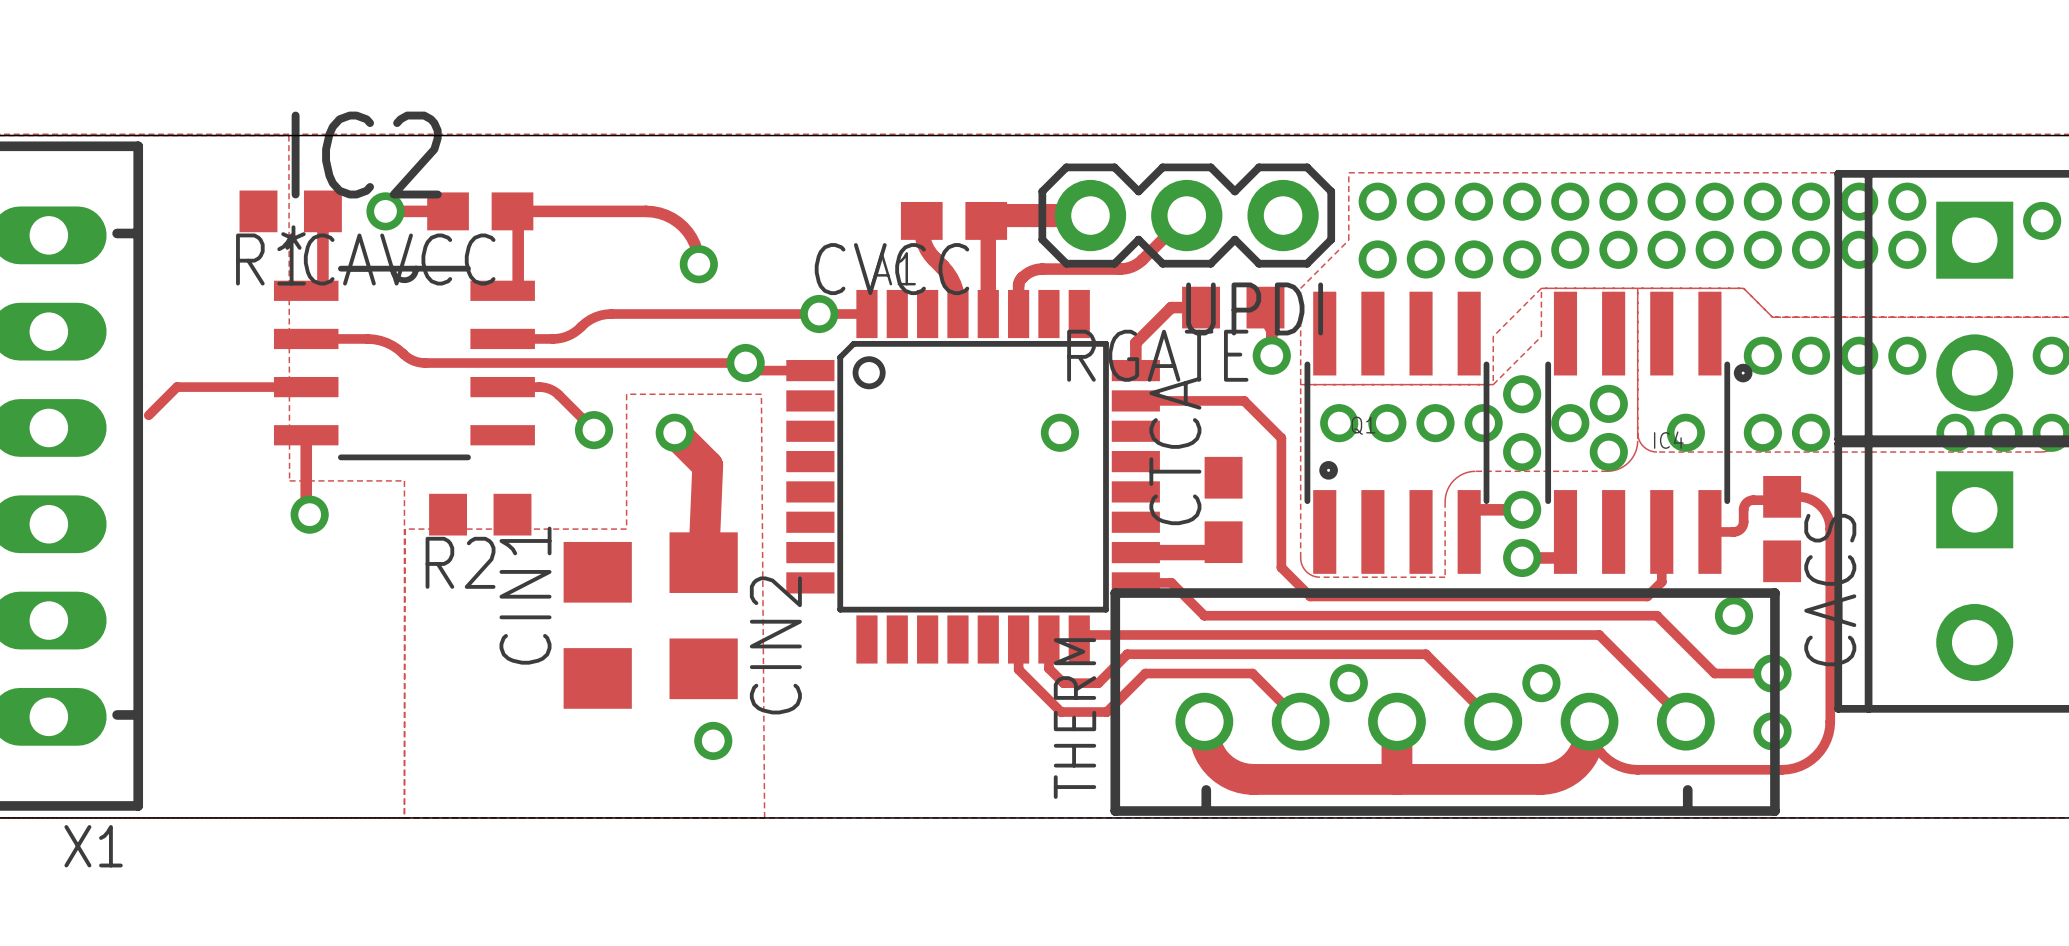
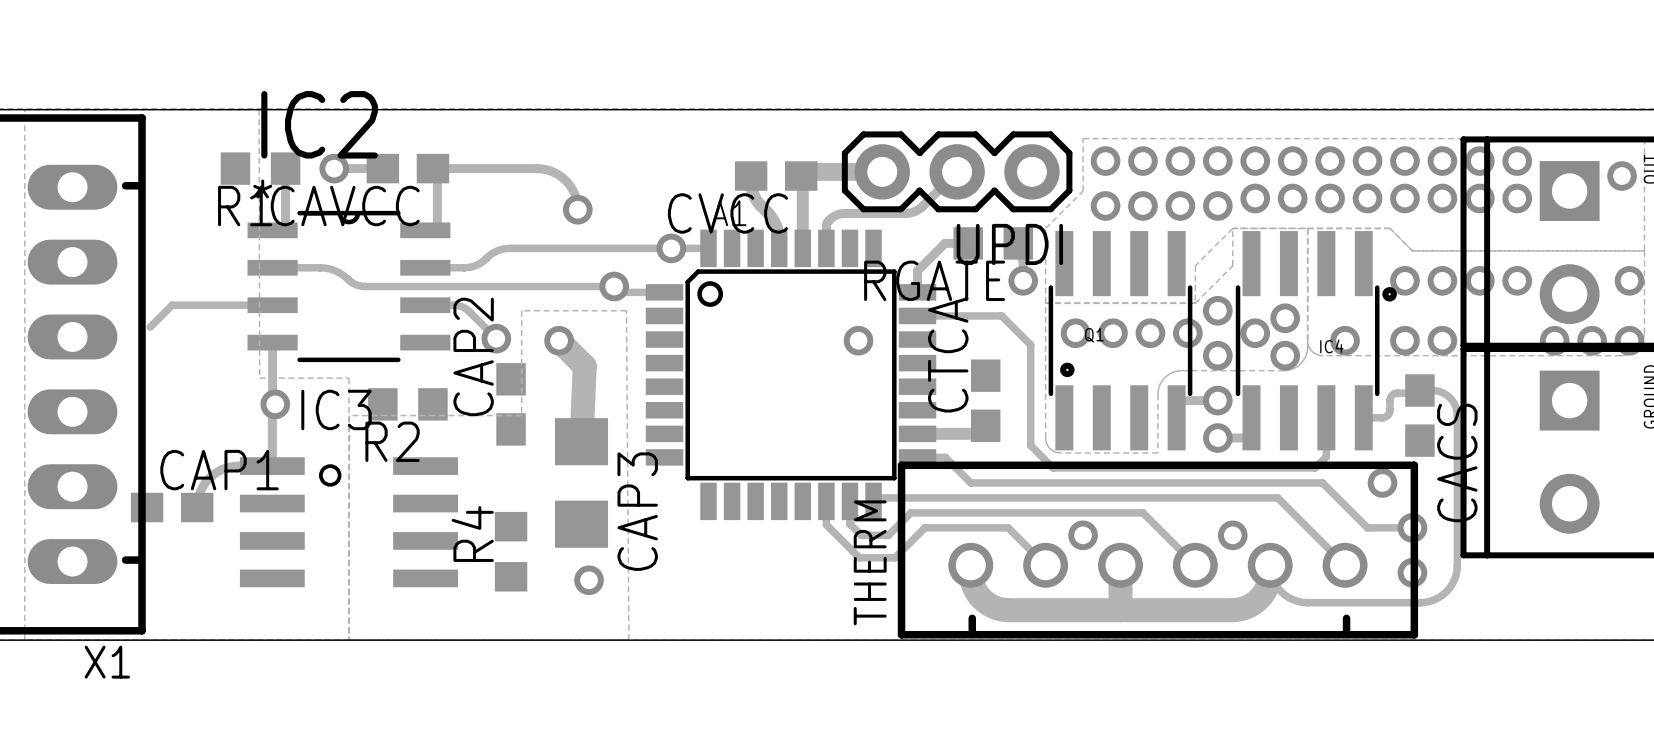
track: none -> (272, 404) (272, 466) (233, 466) (217, 471) (202, 486) (197, 507)
CAP2: none -> (511, 404)
CIN1: (597, 625) -> none
CIN2 name: CIN2 (775, 645) -> CAP3 (637, 511)
CAP1: none -> (172, 507)
IC3: none -> (348, 522)
R4: none -> (511, 551)

